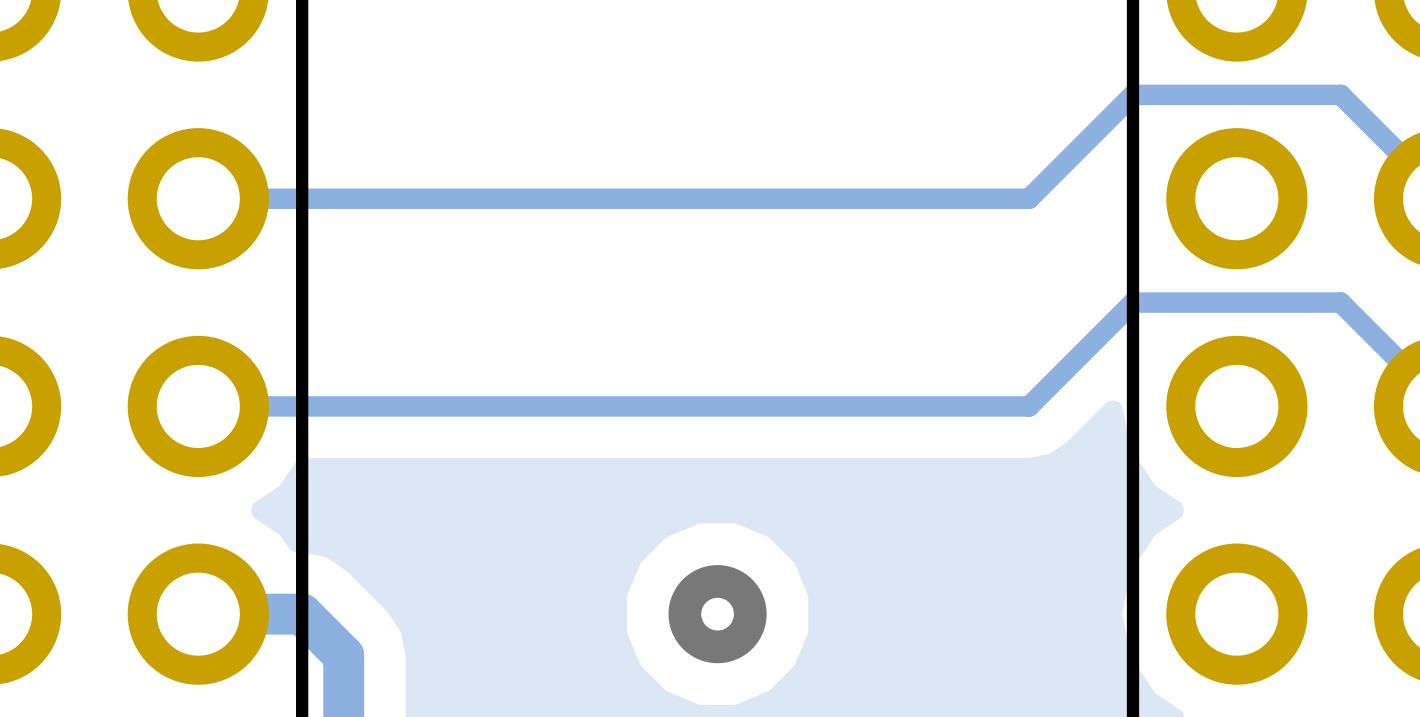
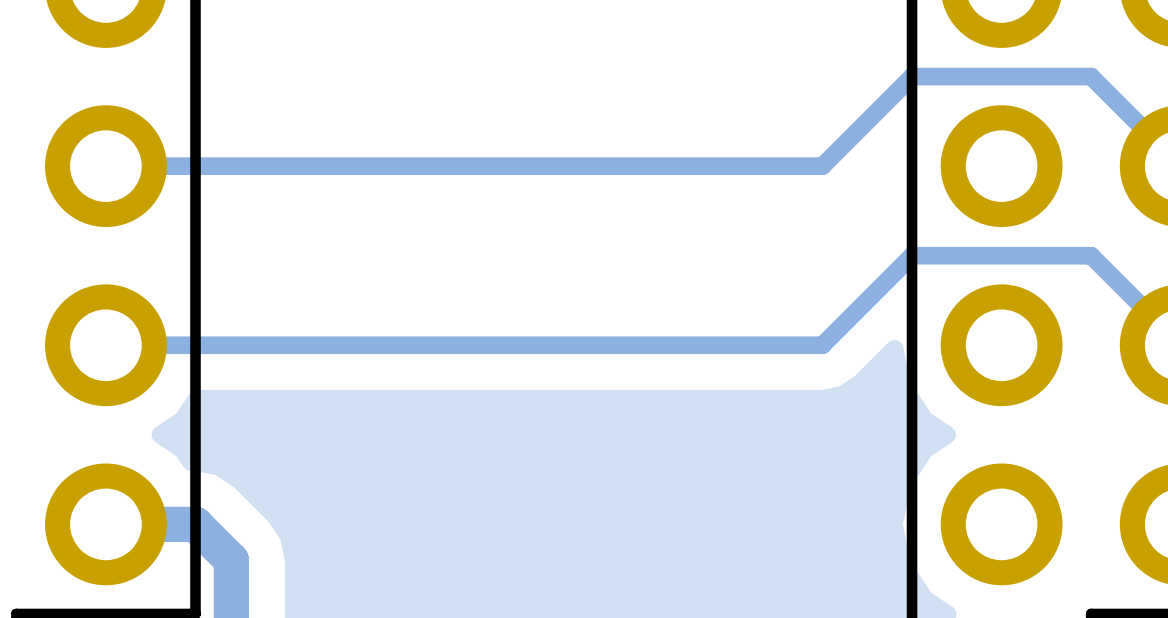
via: (717, 614) -> none

